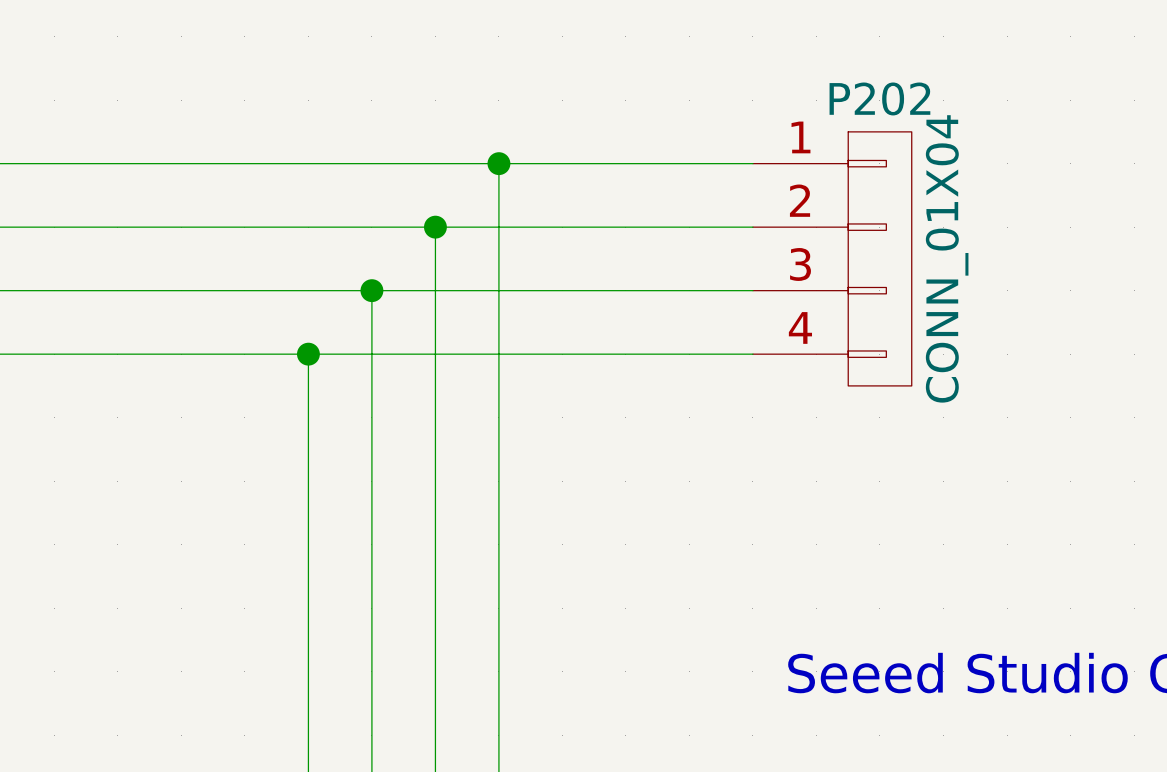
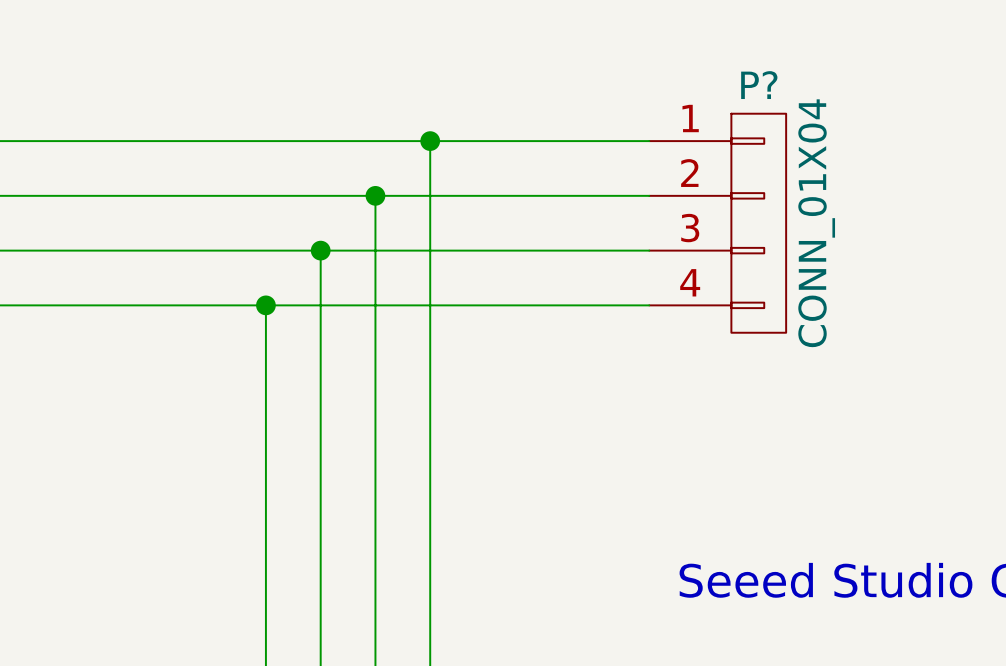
P202 name: P202 (879, 98) -> P? (759, 85)

